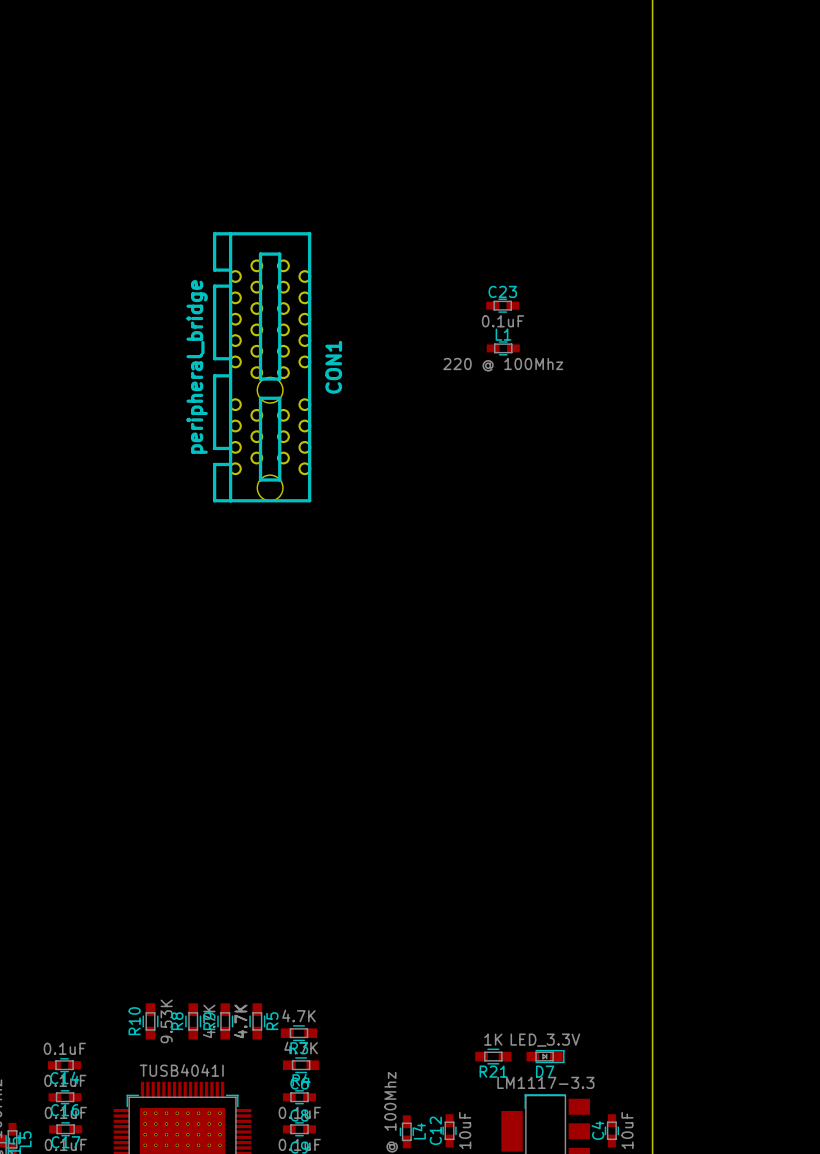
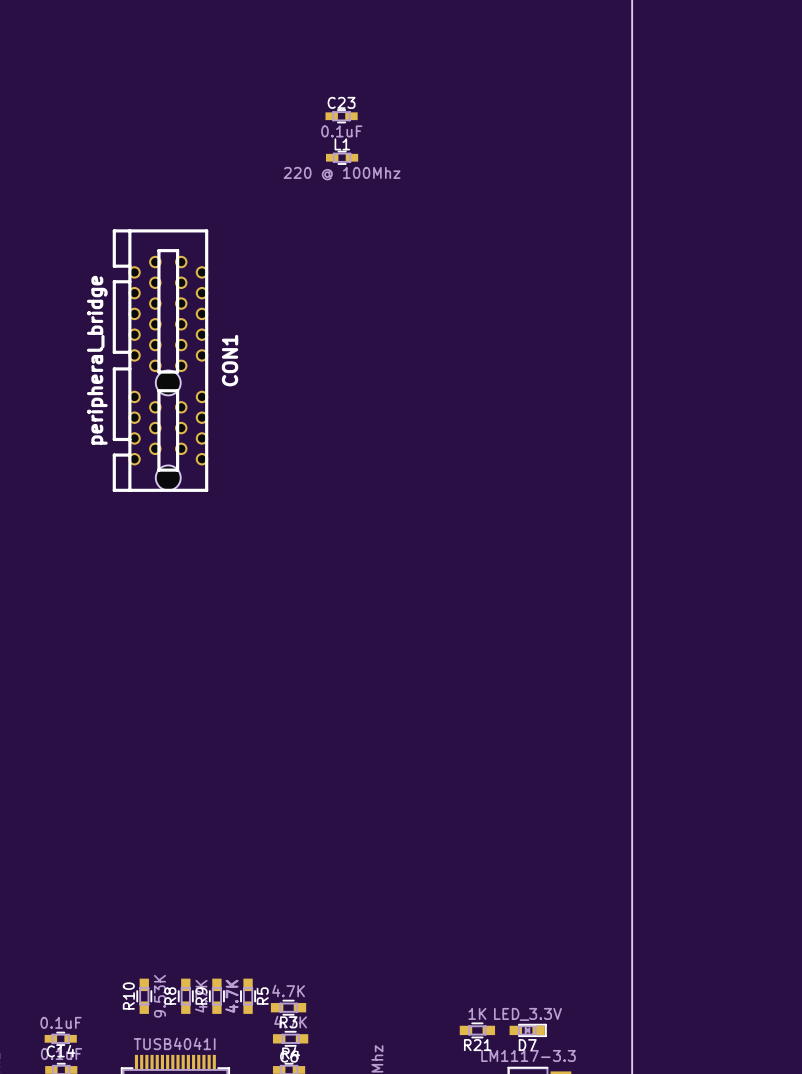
C23 position: (502, 305) -> (341, 116)
L1 position: (503, 348) -> (342, 157)
CON1 position: (262, 367) -> (160, 360)

